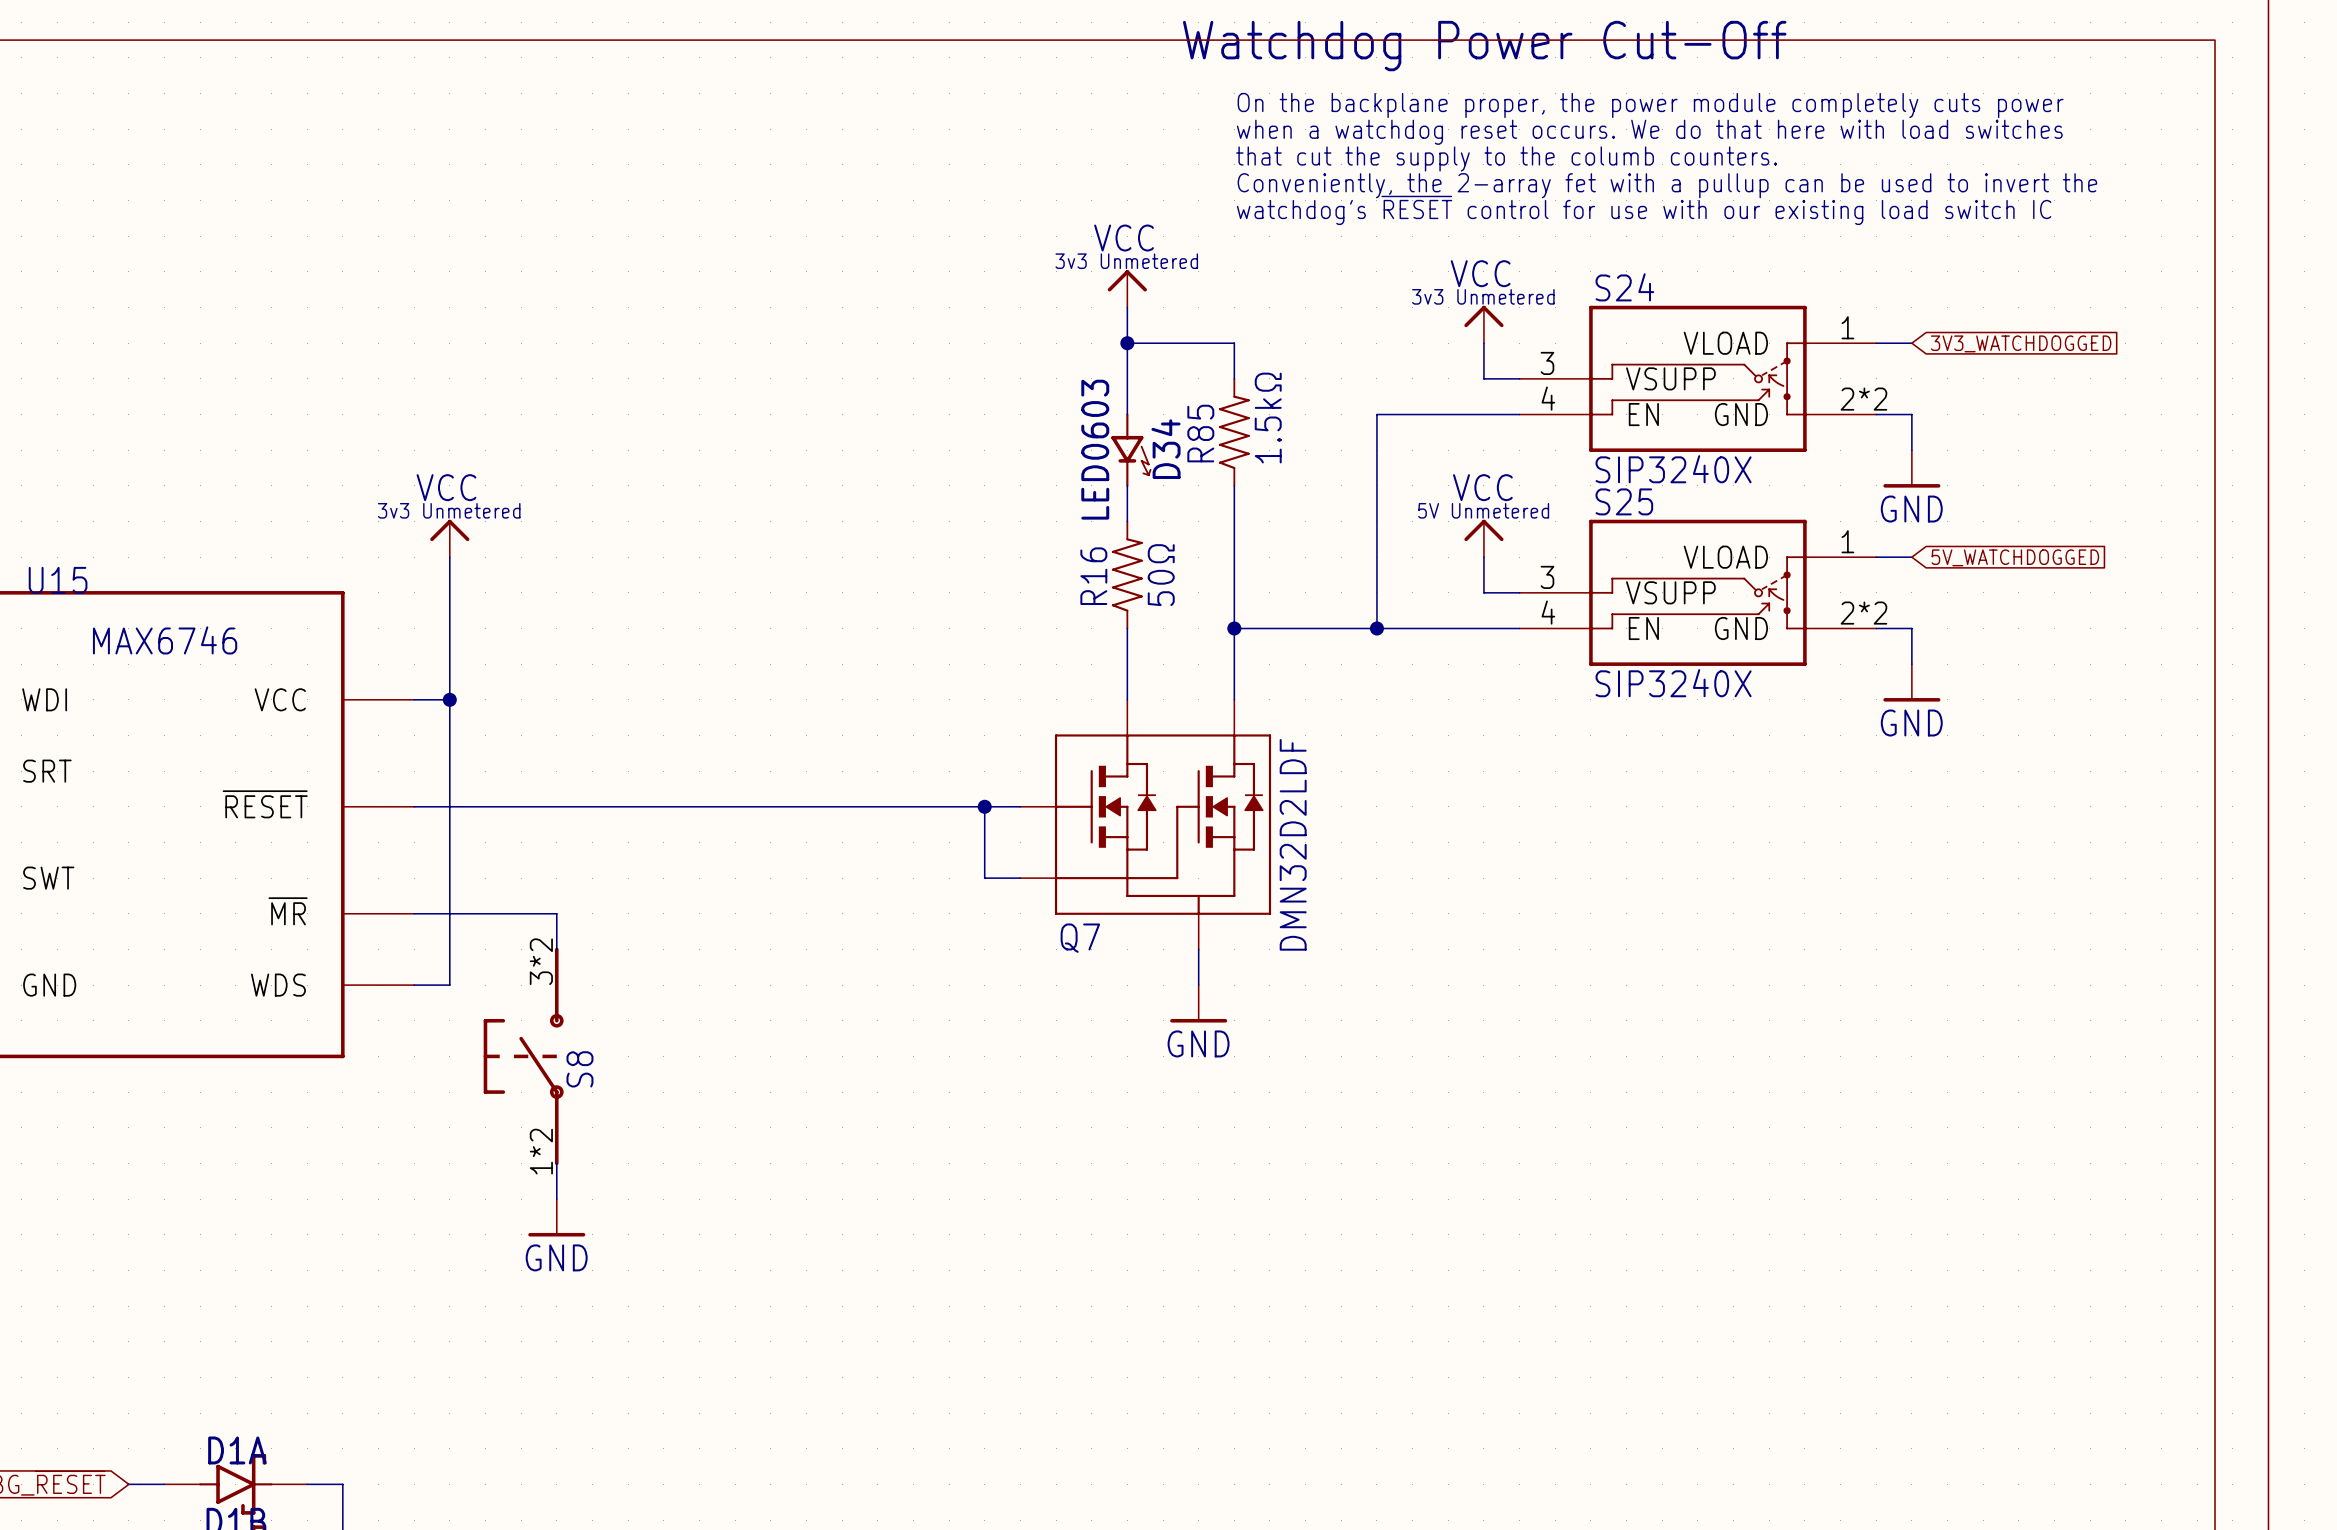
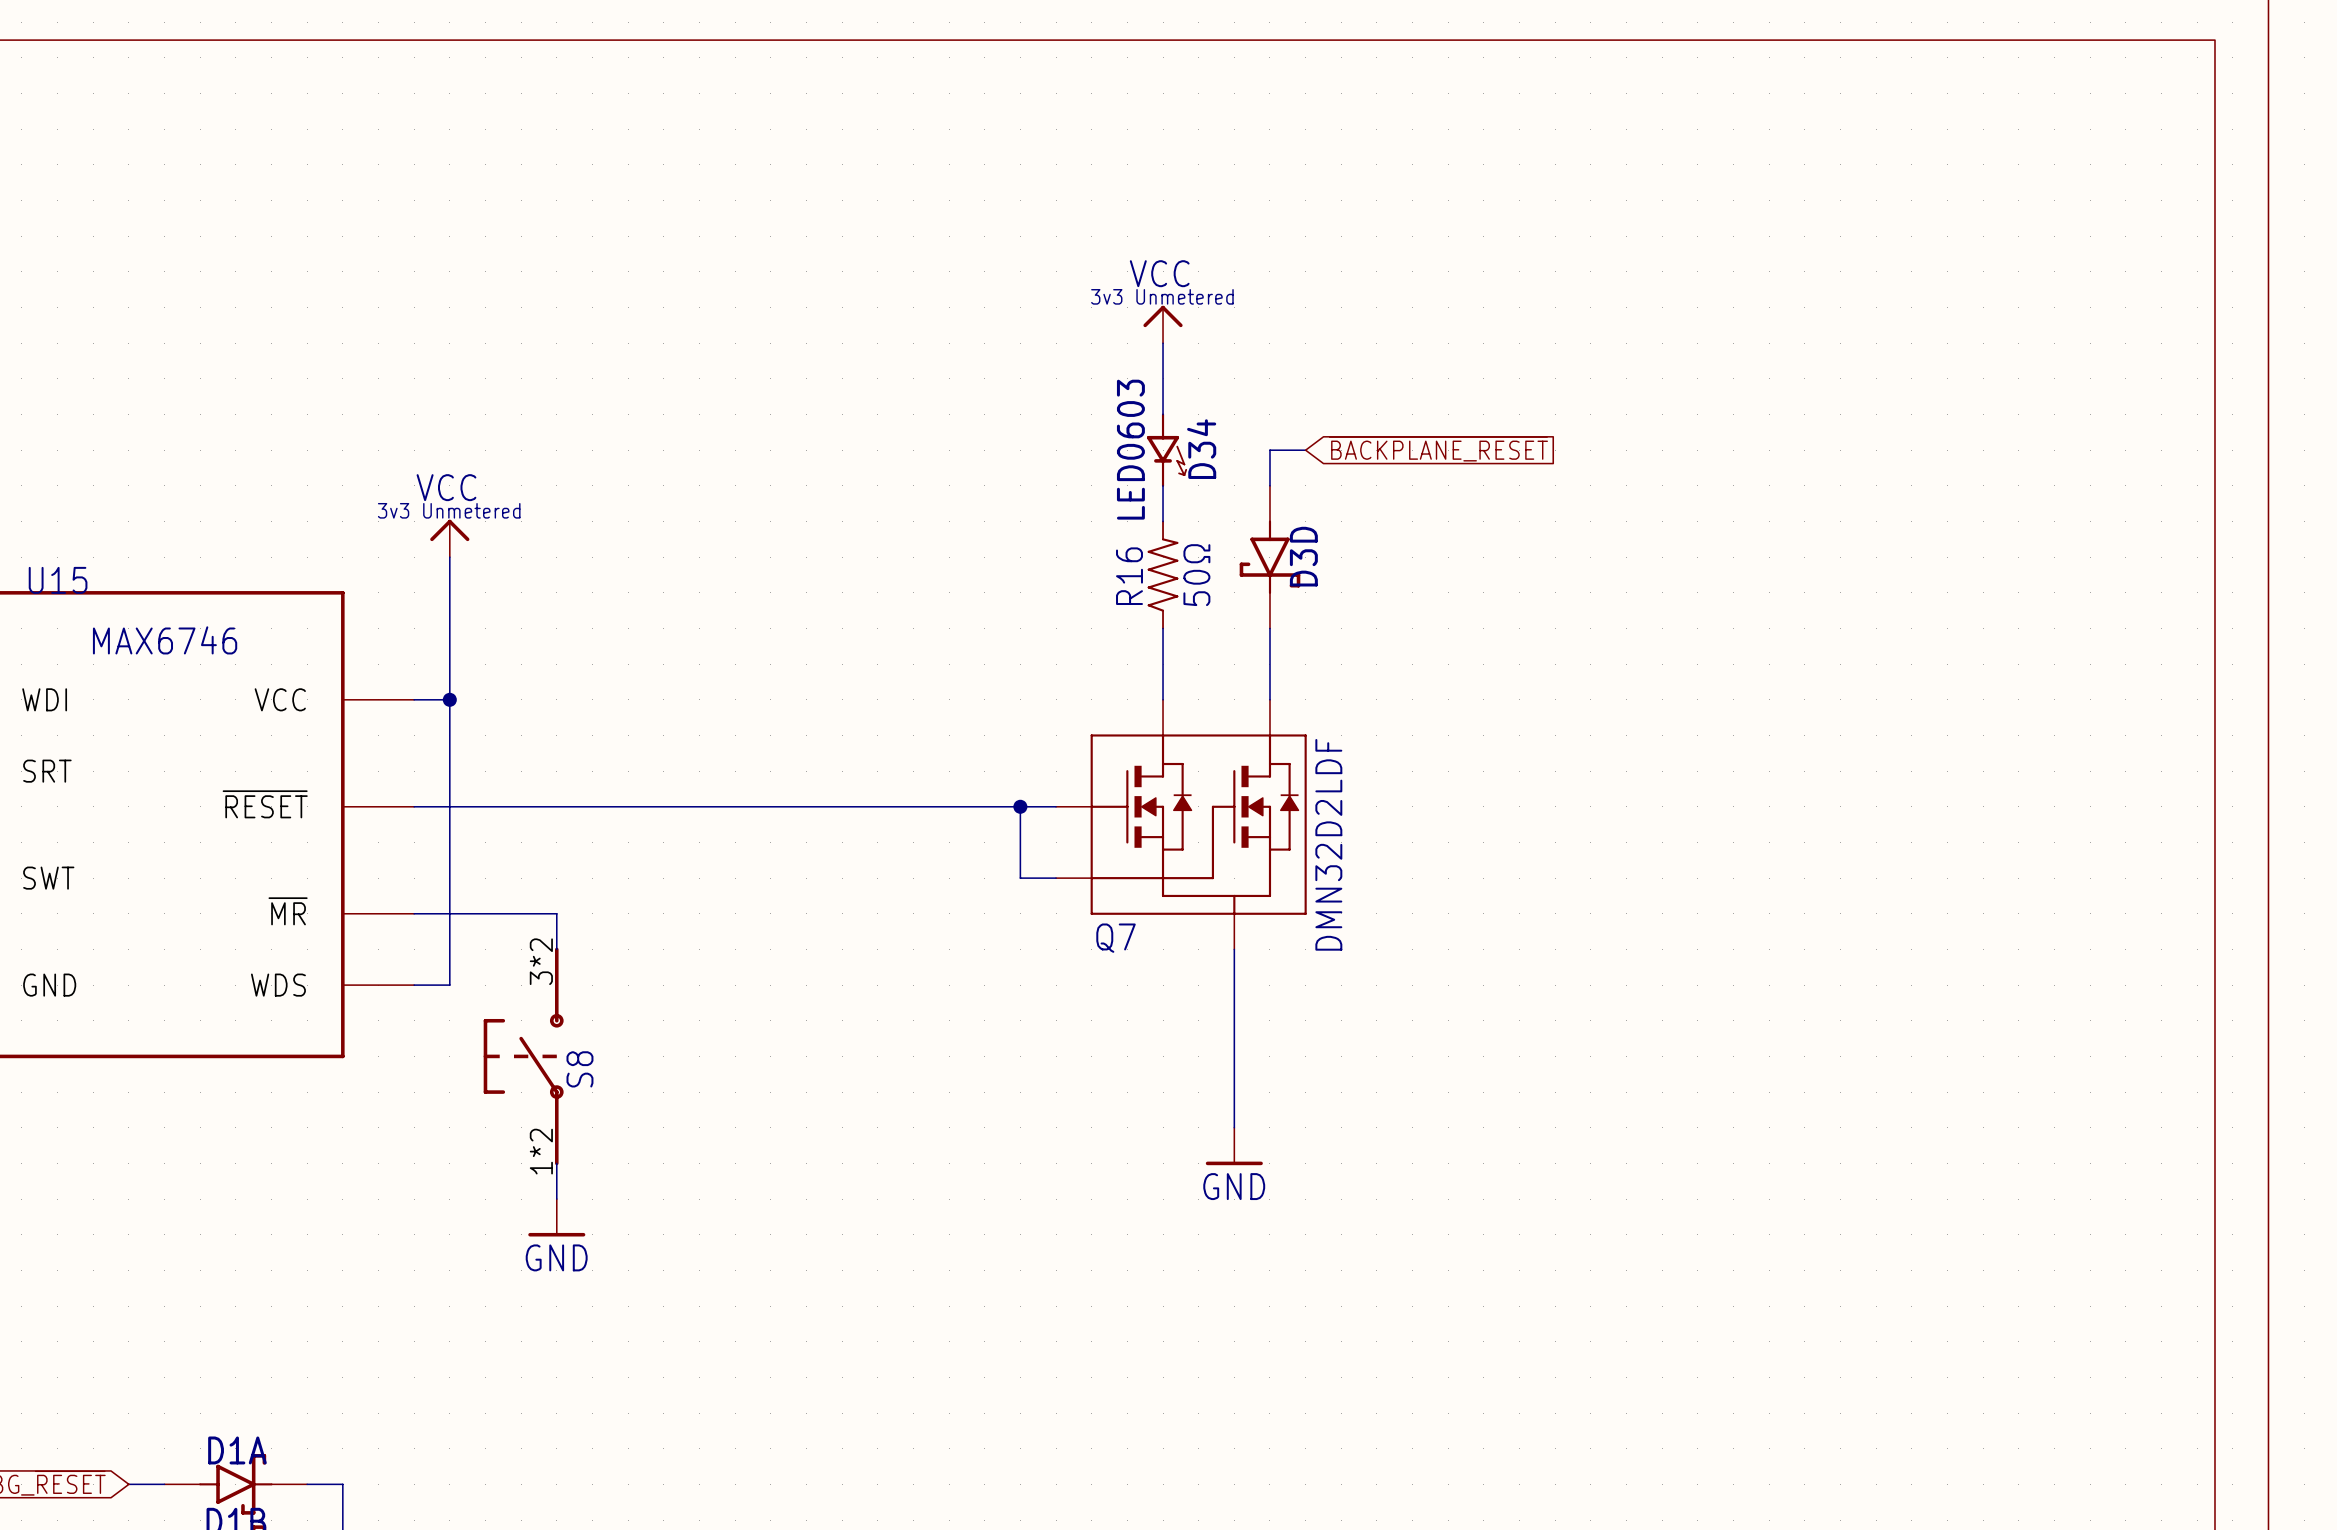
text: Watchdog Power Cut-Off (1484, 46) -> none
text: On the backplane proper, the power module completely cuts power (1650, 105) -> none
text: when a watchdog reset occurs. We do that here with load switches (1649, 132) -> none
text: that cut the supply to the columb counters. (1506, 158) -> none
text: Conveniently, the 2-array fet with a pullup can be used to invert the (1667, 185) -> none
text: watchdog's ~{RESET} control for use with our existing load switch IC (1644, 210) -> none
power symbol position: (1127, 288) -> (1163, 324)
wire: (1127, 307) (1127, 414) -> none
power symbol: (1483, 324) -> none
wire: (1127, 343) (1234, 343) (1234, 378) -> none
junction: (1127, 343) -> none
wire: none -> (1163, 343) (1163, 414)
wire: (1483, 343) (1483, 378) (1519, 378) -> none
wire: (1876, 343) (1911, 343) -> none
global label: 3V3_WATCHDOGGED (2021, 343) -> none
S24: SIP3240X (1697, 378) -> none
wire: (1519, 414) (1376, 414) (1376, 628) -> none
wire: (1876, 414) (1911, 414) (1911, 450) -> none
R85: 1.5kΩ (1234, 432) -> none
global label: none -> ~{BACKPLANE_RESET} (1438, 448)
D34 position: (1131, 450) -> (1167, 450)
wire: none -> (1305, 450) (1269, 450) (1269, 485)
power symbol: GND (1911, 468) -> none
wire: (1127, 485) (1127, 521) -> (1163, 485) (1163, 521)
wire: (1234, 485) (1234, 699) -> none
power symbol: (1483, 538) -> none
D3D: none -> (1269, 557)
wire: (1483, 557) (1483, 592) (1519, 592) -> none
wire: (1876, 557) (1911, 557) -> none
global label: 5V_WATCHDOGGED (2015, 557) -> none
R16 position: (1127, 575) -> (1163, 575)
S25: SIP3240X (1697, 592) -> none
wire: (1127, 628) (1127, 699) -> (1163, 628) (1163, 699)
wire: (1234, 628) (1519, 628) -> none
junction: (1234, 628) -> none
wire: none -> (1269, 628) (1269, 699)
junction: (1376, 628) -> none
wire: (1876, 628) (1911, 628) (1911, 664) -> none
power symbol: GND (1911, 682) -> none
wire: (984, 806) (984, 878) (1020, 878) -> none
junction position: (984, 806) -> (1020, 806)
wire: none -> (1056, 806) (1020, 806) (1020, 878) (1056, 878)
Q7 position: (1145, 824) -> (1181, 824)
wire: (1198, 949) (1198, 985) -> none
wire: none -> (1234, 949) (1234, 1127)
power symbol position: GND (1198, 1003) -> GND (1234, 1146)

